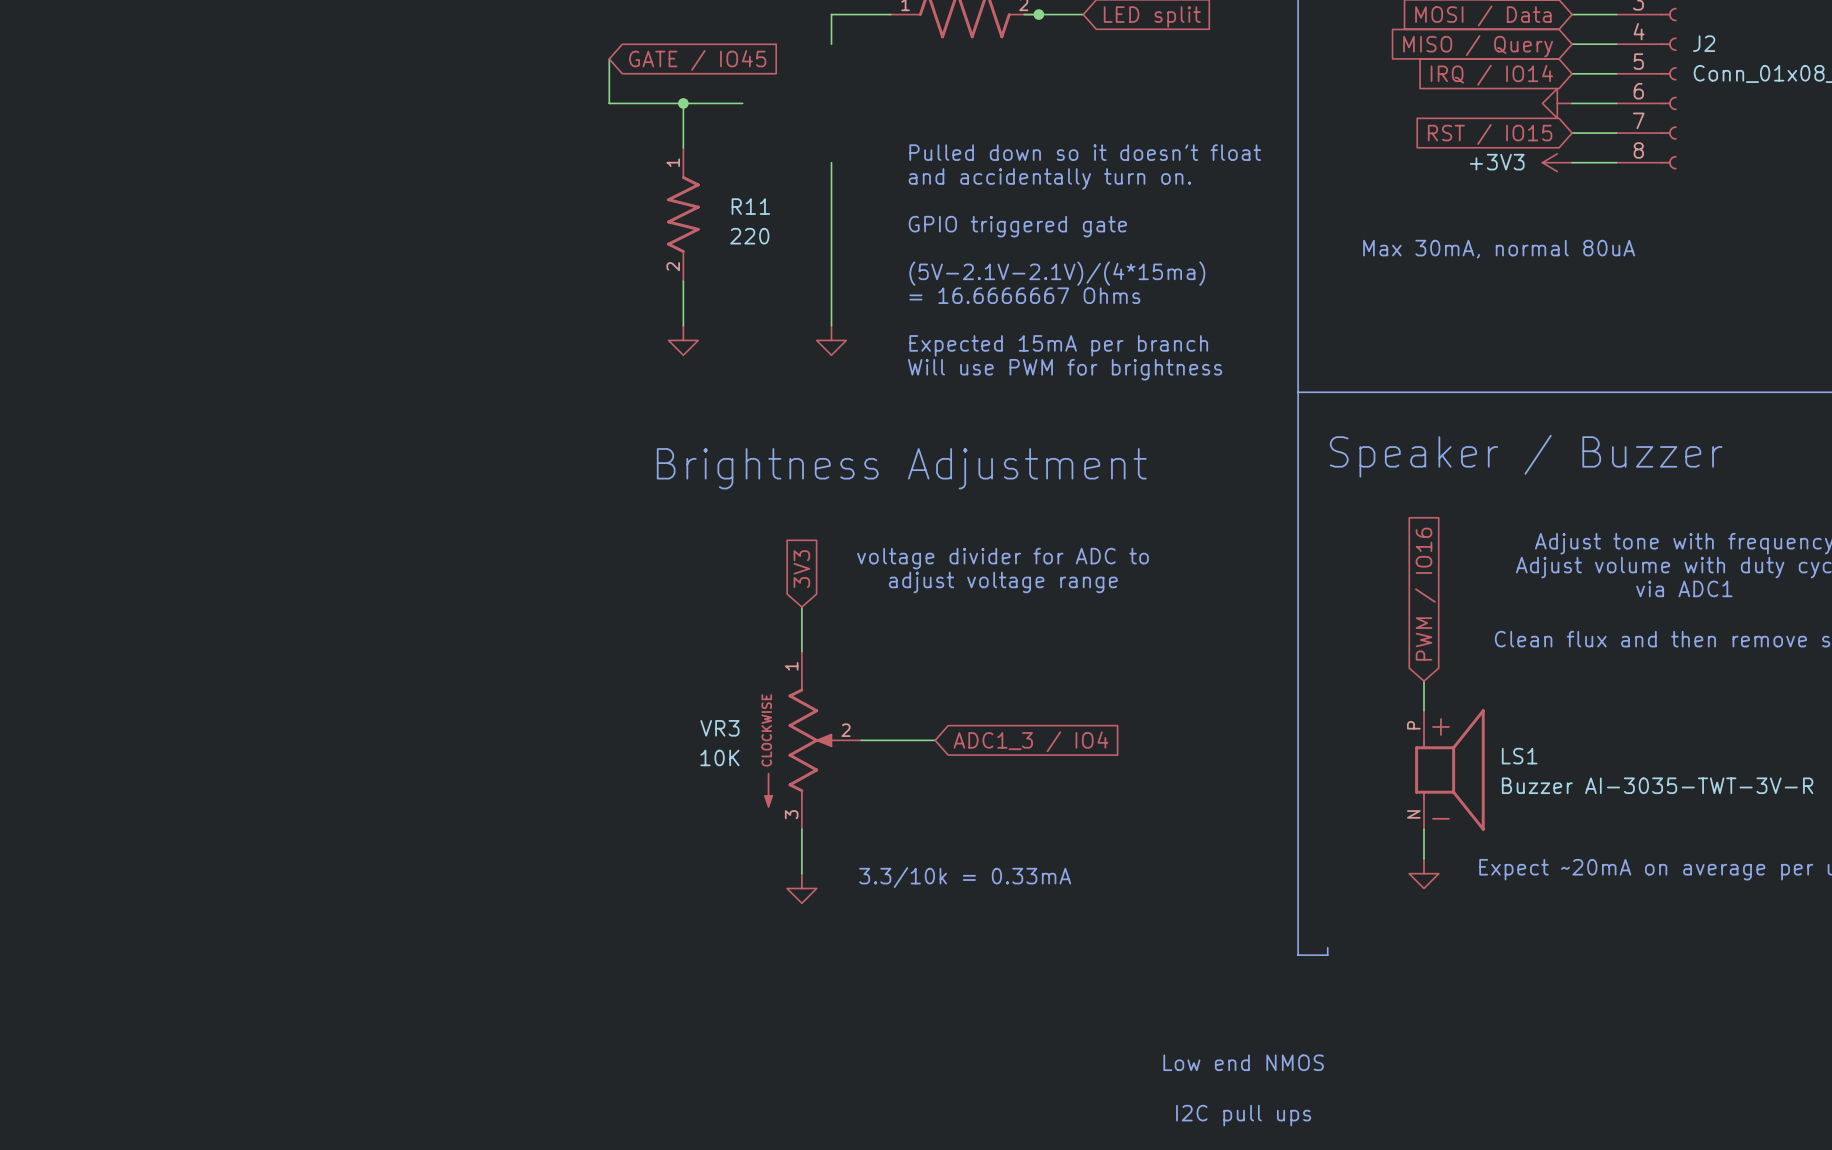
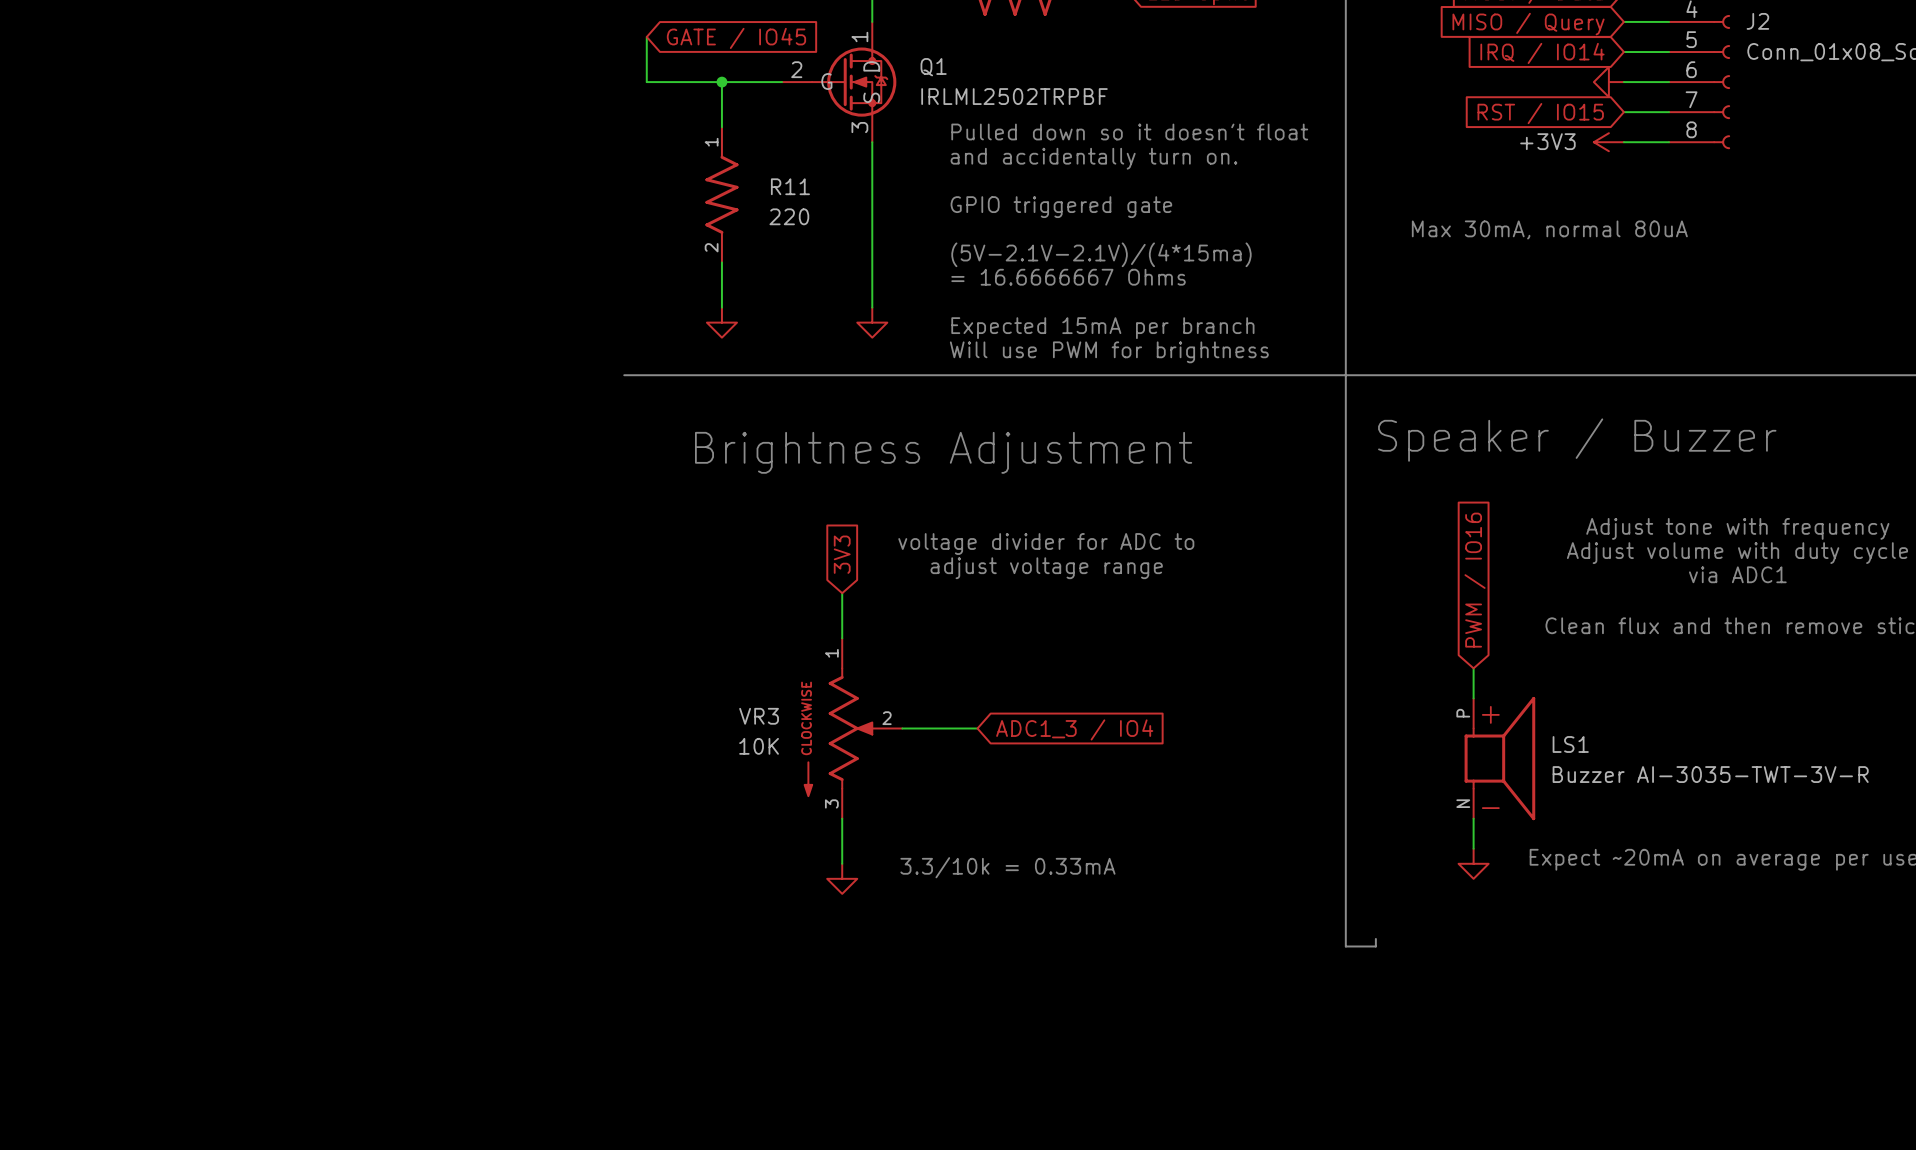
Q1: none -> IRLML2502TRPBF (839, 82)
line: none -> (624, 375) (1345, 375)
text: Low end NMOS (1243, 1062) -> none
text: I2C pull ups (1243, 1115) -> none

